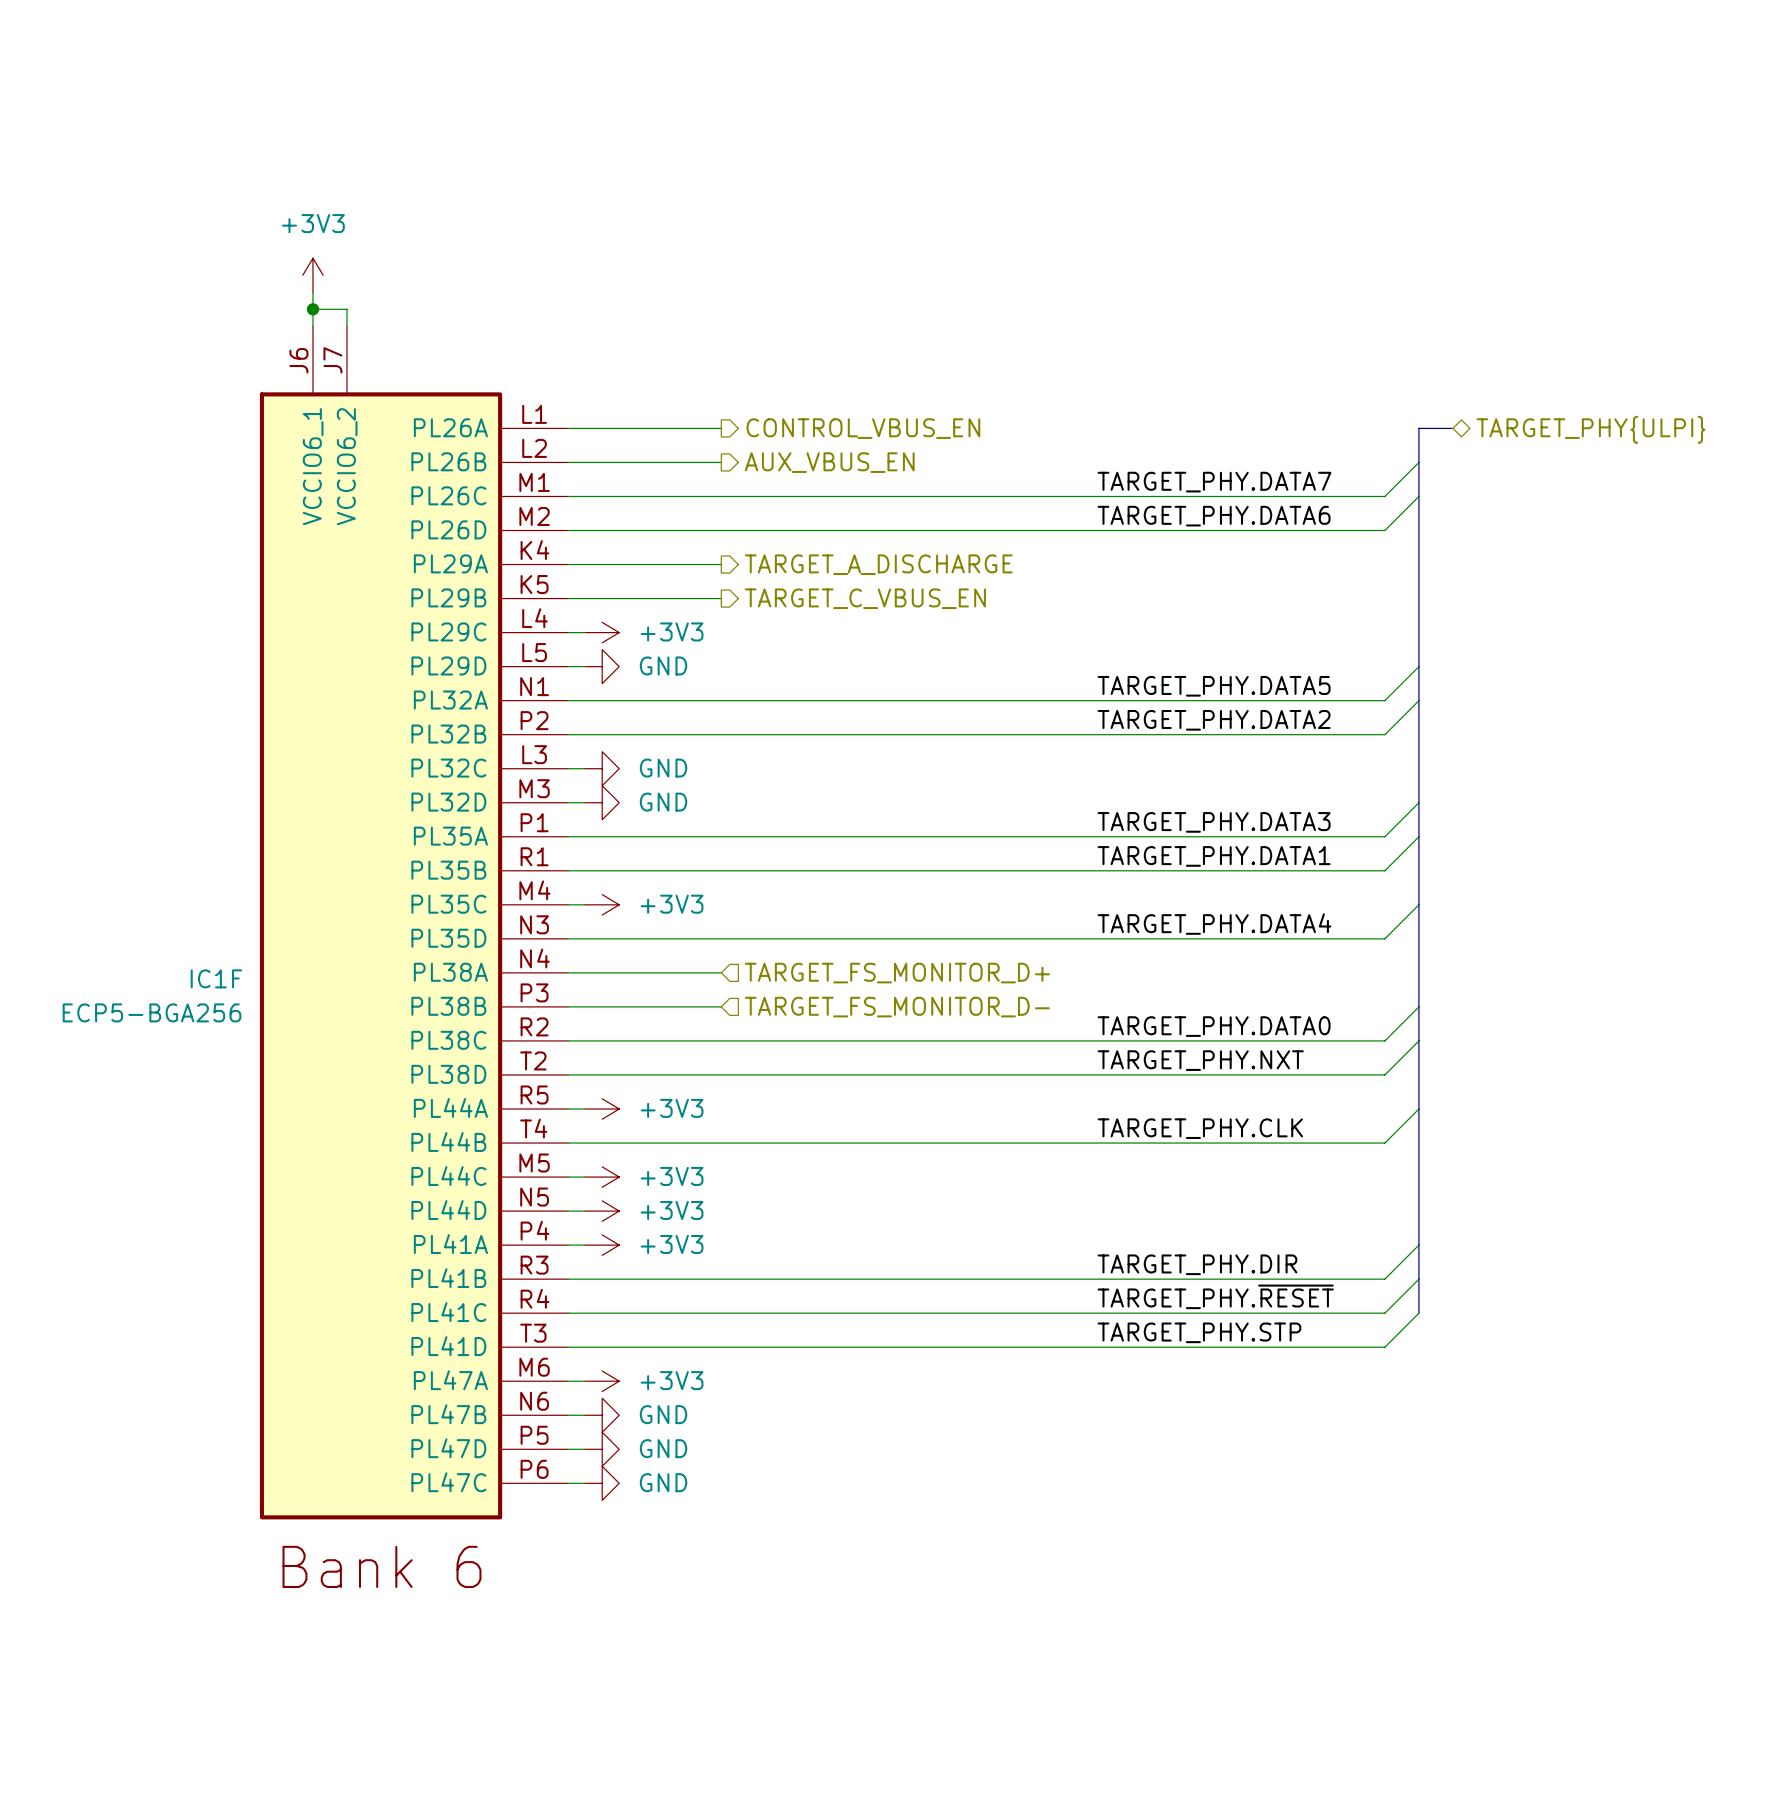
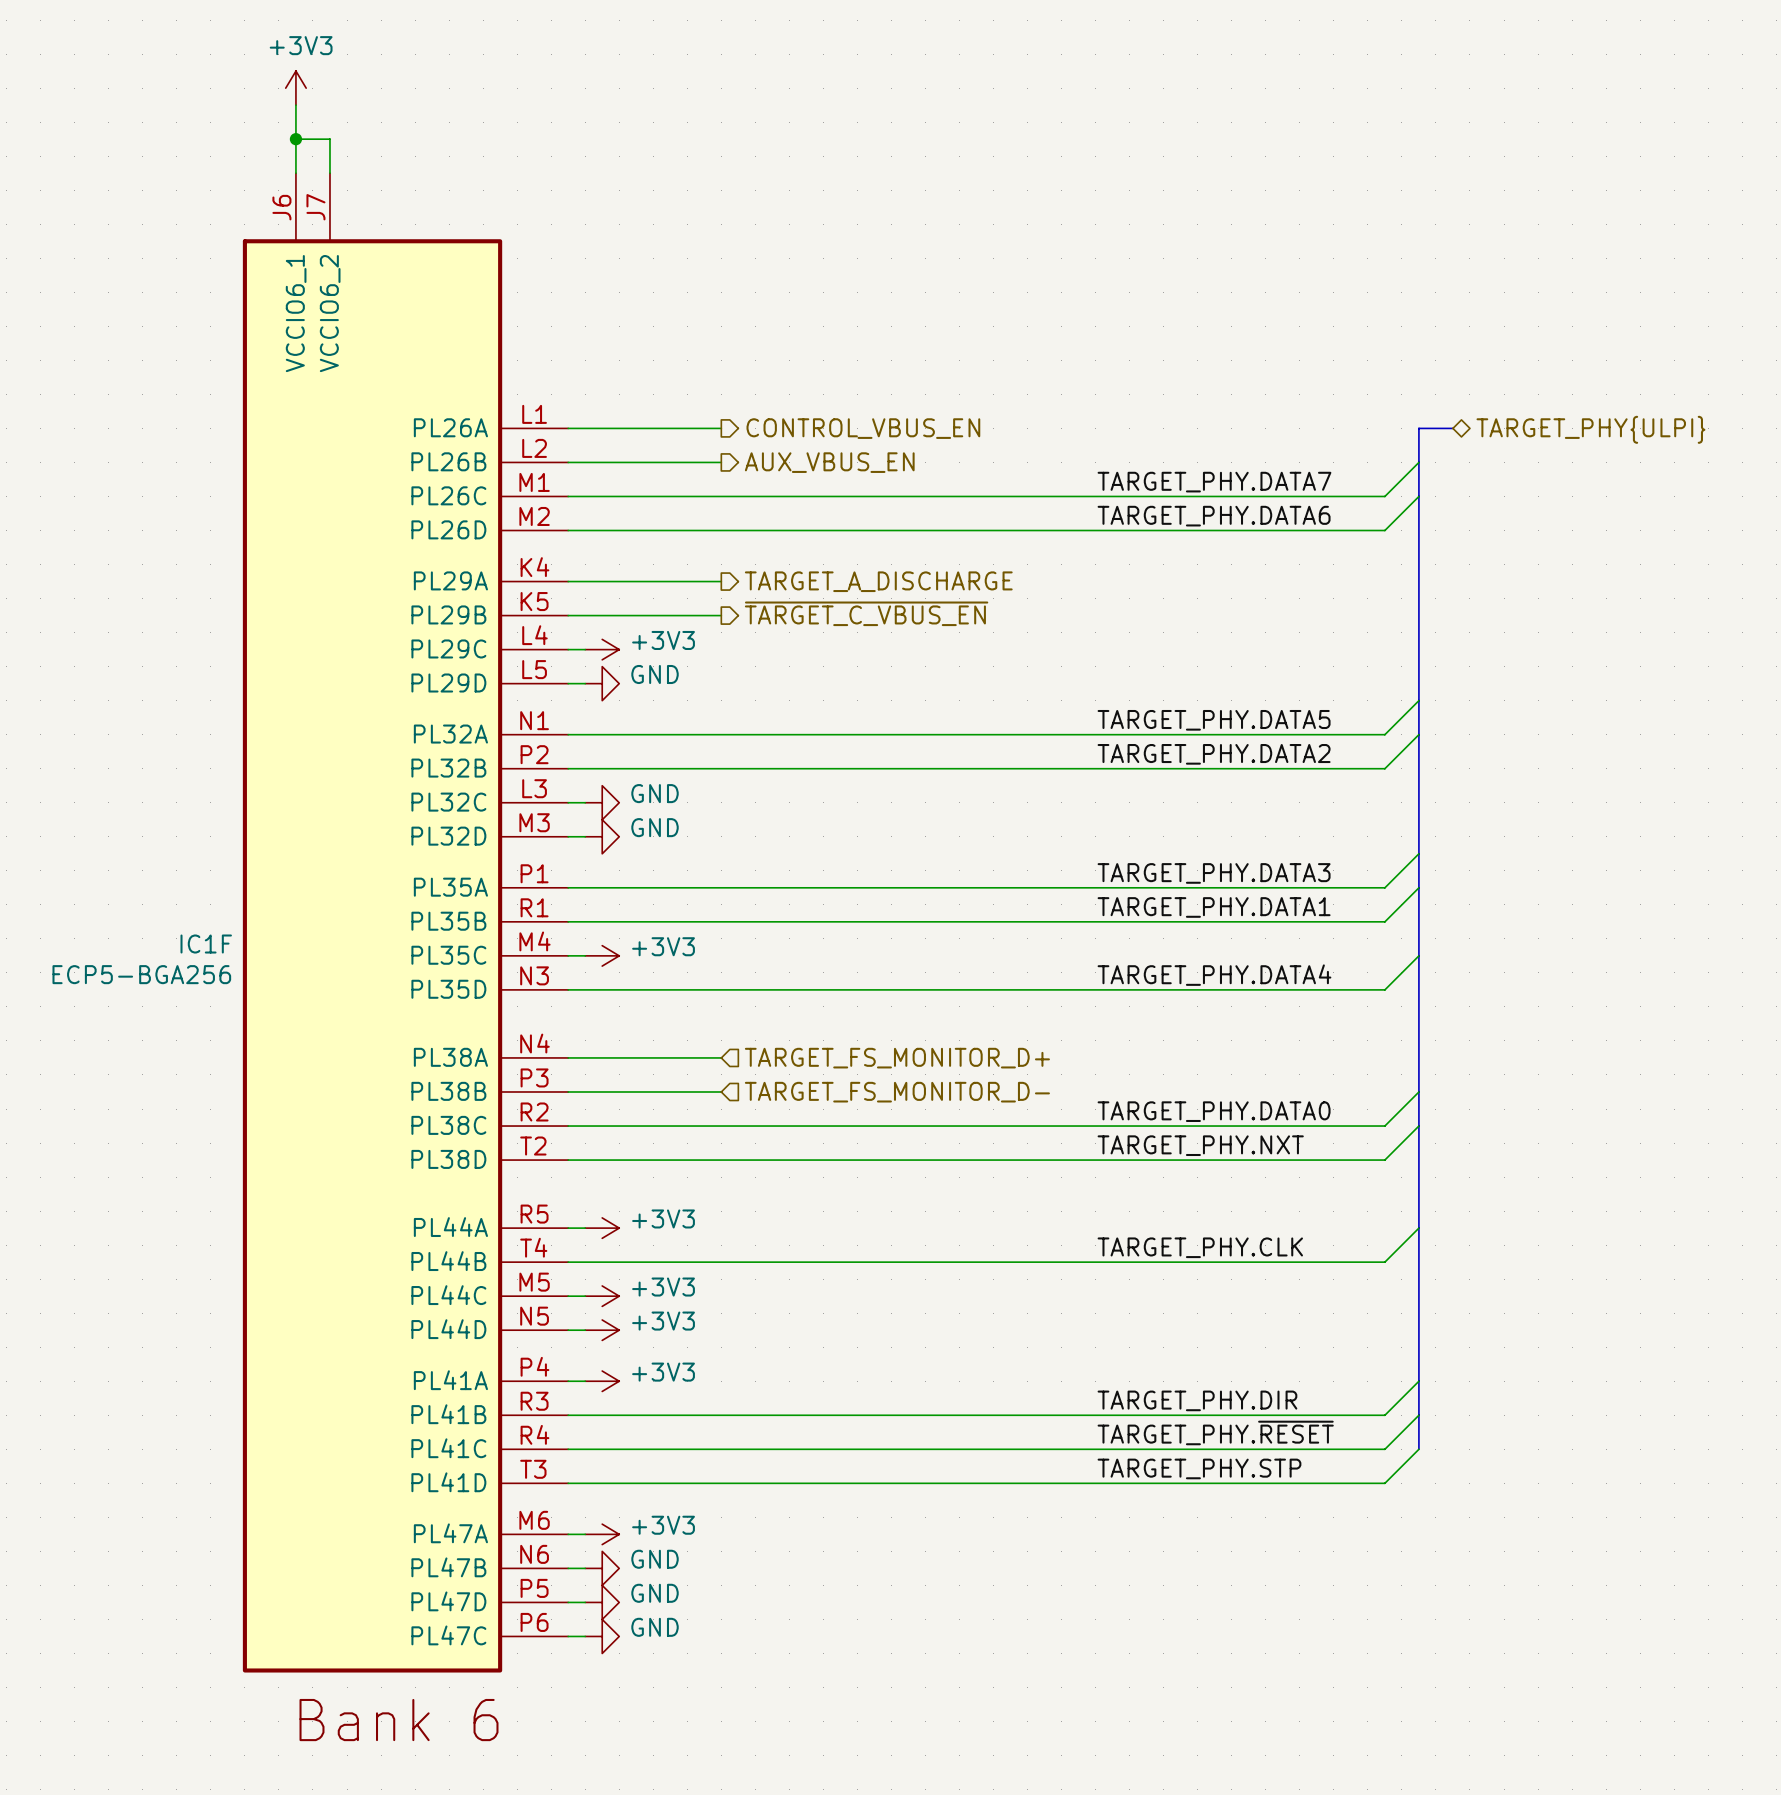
wire: none -> (295, 105) (295, 173)
wire: none -> (295, 139) (329, 139) (329, 173)
junction: none -> (295, 139)
power symbol text position: +3V3 (313, 223) -> +3V3 (301, 45)
power symbol position: +3V3 (312, 275) -> +3V3 (295, 88)
junction: (312, 309) -> none
IC1F symbol: [259, 326, 569, 1520] -> [242, 173, 569, 1673]
wire: (568, 564) (721, 564) -> (568, 615) (721, 615)
hierarchical label position: TARGET_A_DISCHARGE (878, 564) -> TARGET_A_DISCHARGE (878, 581)
wire: (568, 598) (721, 598) -> (568, 581) (721, 581)
hierarchical label: TARGET_C_VBUS_EN (865, 598) -> ~{TARGET_C_VBUS_EN} (866, 613)
power symbol text position: +3V3 (672, 631) -> +3V3 (663, 640)
wire: (568, 632) (585, 632) -> (568, 683) (585, 683)
power symbol position: +3V3 (602, 632) -> +3V3 (602, 649)
power symbol text position: GND (663, 665) -> GND (655, 674)
wire: (568, 666) (585, 666) -> (568, 649) (585, 649)
power symbol position: GND (602, 666) -> GND (602, 683)
wire: (1418, 666) (1384, 700) (568, 700) -> none
label: TARGET_PHY.DATA5 (1214, 686) -> none
label: TARGET_PHY.DATA2 (1214, 720) -> TARGET_PHY.DATA5 (1214, 720)
label: none -> TARGET_PHY.DATA2 (1214, 754)
power symbol: GND (602, 768) -> none
power symbol text position: GND (663, 802) -> GND (655, 793)
wire: (1418, 802) (1384, 836) (585, 836) -> (1418, 734) (1384, 768) (585, 768)
label position: TARGET_PHY.DATA3 (1214, 822) -> TARGET_PHY.DATA3 (1214, 873)
power symbol: none -> GND (602, 836)
wire: (1418, 836) (1384, 870) (568, 870) -> (1418, 887) (1384, 921) (568, 921)
label position: TARGET_PHY.DATA1 (1214, 856) -> TARGET_PHY.DATA1 (1214, 907)
wire: (568, 904) (585, 904) -> (568, 955) (585, 955)
power symbol position: +3V3 (602, 904) -> +3V3 (602, 955)
power symbol text position: +3V3 (672, 904) -> +3V3 (663, 946)
wire: (1418, 904) (1384, 938) (568, 938) -> (1418, 955) (1384, 989) (568, 989)
label position: TARGET_PHY.DATA4 (1214, 924) -> TARGET_PHY.DATA4 (1214, 975)
wire: (568, 972) (721, 972) -> (568, 1091) (721, 1091)
hierarchical label position: TARGET_FS_MONITOR_D+ (897, 973) -> TARGET_FS_MONITOR_D+ (897, 1058)
IC1F name position: IC1F (216, 978) -> IC1F (206, 944)
wire: (568, 1006) (721, 1006) -> (568, 1057) (721, 1057)
wire: (1418, 1006) (1384, 1040) (568, 1040) -> (1418, 853) (1384, 887) (568, 887)
hierarchical label position: TARGET_FS_MONITOR_D- (897, 1007) -> TARGET_FS_MONITOR_D- (897, 1092)
IC1F value position: ECP5-BGA256 (152, 1012) -> ECP5-BGA256 (141, 974)
label position: TARGET_PHY.DATA0 (1214, 1026) -> TARGET_PHY.DATA0 (1214, 1111)
wire: (1418, 1040) (1384, 1074) (568, 1074) -> (1418, 1091) (1384, 1126) (568, 1126)
label position: TARGET_PHY.NXT (1200, 1060) -> TARGET_PHY.NXT (1200, 1145)
wire: (568, 1109) (585, 1109) -> none
power symbol: +3V3 (602, 1109) -> none
wire: (1418, 1109) (1384, 1143) (568, 1143) -> (1418, 1126) (1384, 1160) (568, 1160)
label position: TARGET_PHY.CLK (1200, 1128) -> TARGET_PHY.CLK (1200, 1247)
wire: (568, 1177) (585, 1177) -> (568, 1228) (585, 1228)
power symbol: +3V3 (602, 1177) -> none
wire: (568, 1211) (585, 1211) -> (568, 1330) (585, 1330)
power symbol: +3V3 (602, 1211) -> none
power symbol: none -> +3V3 (602, 1228)
wire: (568, 1245) (585, 1245) -> (568, 1296) (585, 1296)
power symbol: +3V3 (602, 1245) -> none
wire: (1418, 1245) (1384, 1279) (568, 1279) -> (1418, 1228) (1384, 1262) (568, 1262)
label position: TARGET_PHY.DIR (1197, 1264) -> TARGET_PHY.DIR (1197, 1400)
wire: (1418, 1279) (1384, 1313) (568, 1313) -> none
power symbol: none -> +3V3 (602, 1296)
label position: TARGET_PHY.~{RESET} (1215, 1296) -> TARGET_PHY.~{RESET} (1215, 1432)
wire: (1418, 1313) (1384, 1347) (568, 1347) -> none
bus: none -> (1418, 1313) (1418, 1449)
power symbol: none -> +3V3 (602, 1330)
label position: TARGET_PHY.STP (1199, 1332) -> TARGET_PHY.STP (1199, 1468)
power symbol text position: +3V3 (672, 1380) -> +3V3 (663, 1372)
wire: none -> (1418, 1381) (1384, 1415) (585, 1415)
power symbol: GND (602, 1415) -> none
wire: none -> (1418, 1415) (1384, 1449) (585, 1449)
power symbol: GND (602, 1449) -> none
wire: none -> (1418, 1449) (1384, 1483) (585, 1483)
power symbol: GND (602, 1483) -> none
wire: none -> (568, 1534) (585, 1534)
power symbol: none -> +3V3 (602, 1534)
wire: none -> (568, 1568) (585, 1568)
power symbol: none -> GND (602, 1568)
wire: none -> (568, 1602) (585, 1602)
power symbol: none -> GND (602, 1602)
wire: none -> (568, 1636) (585, 1636)
power symbol: none -> GND (602, 1636)

